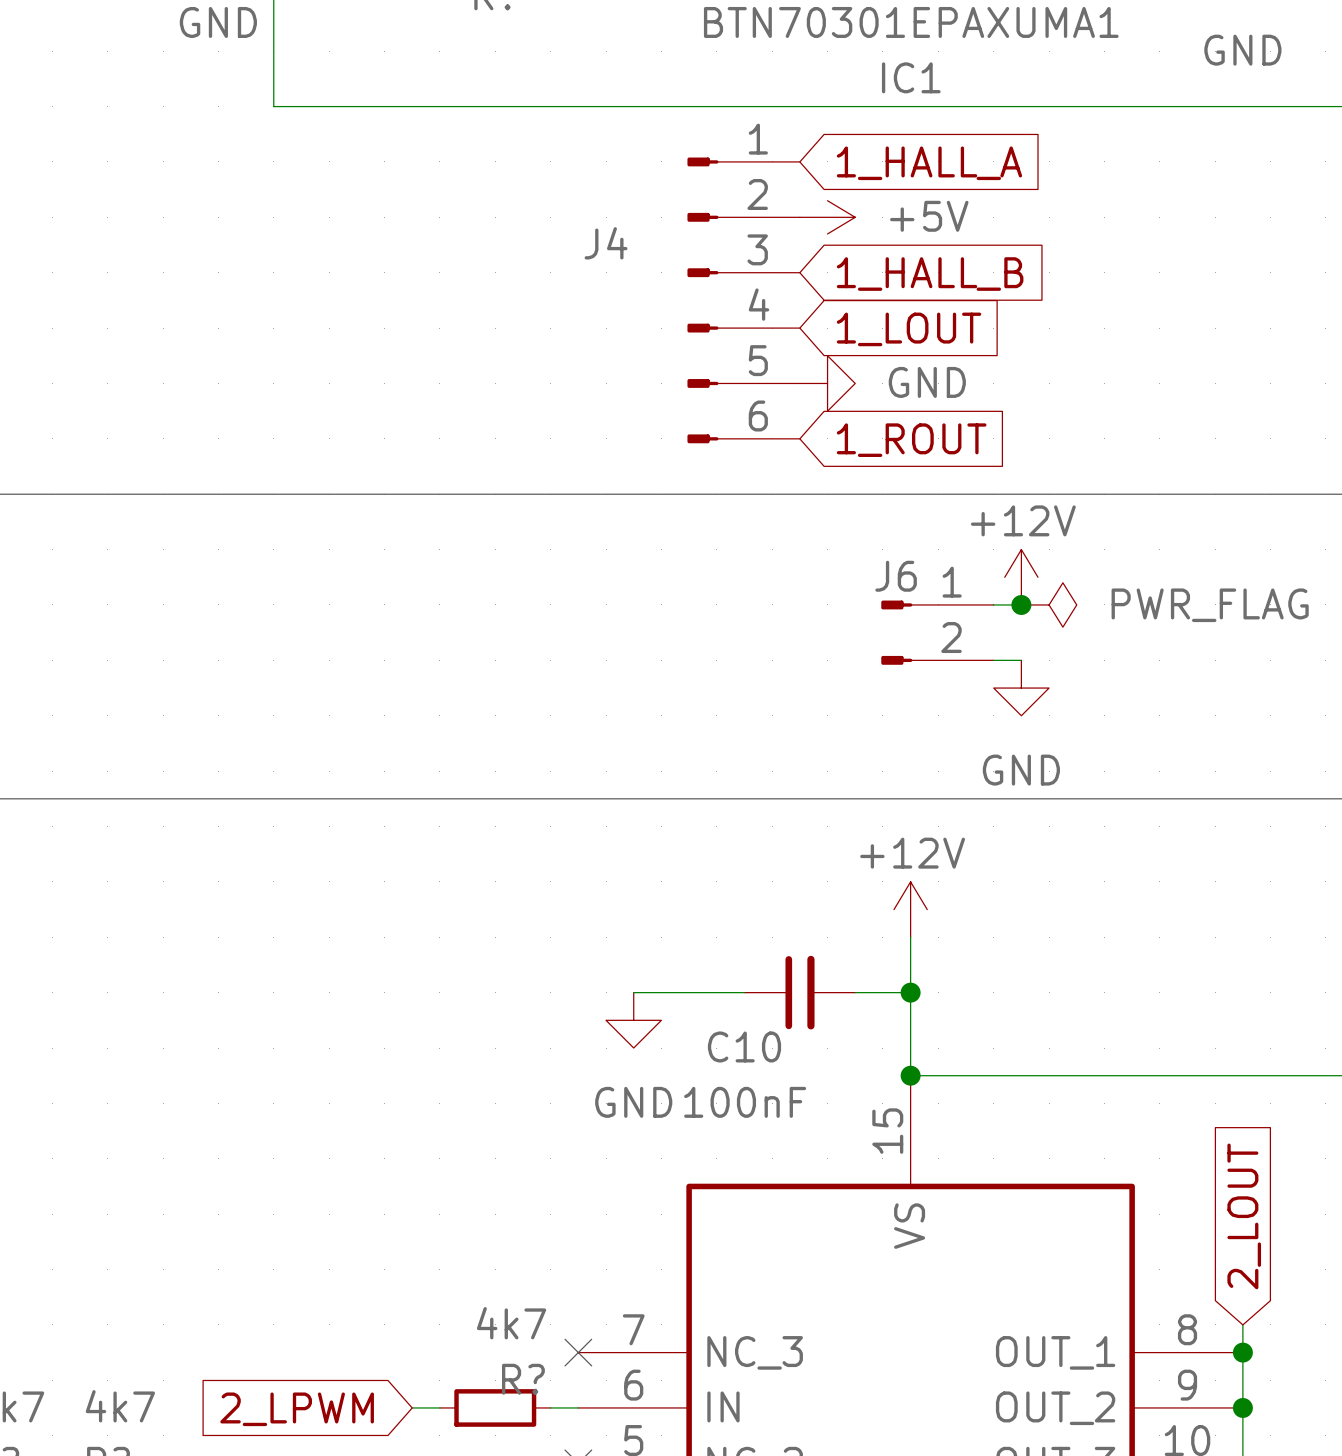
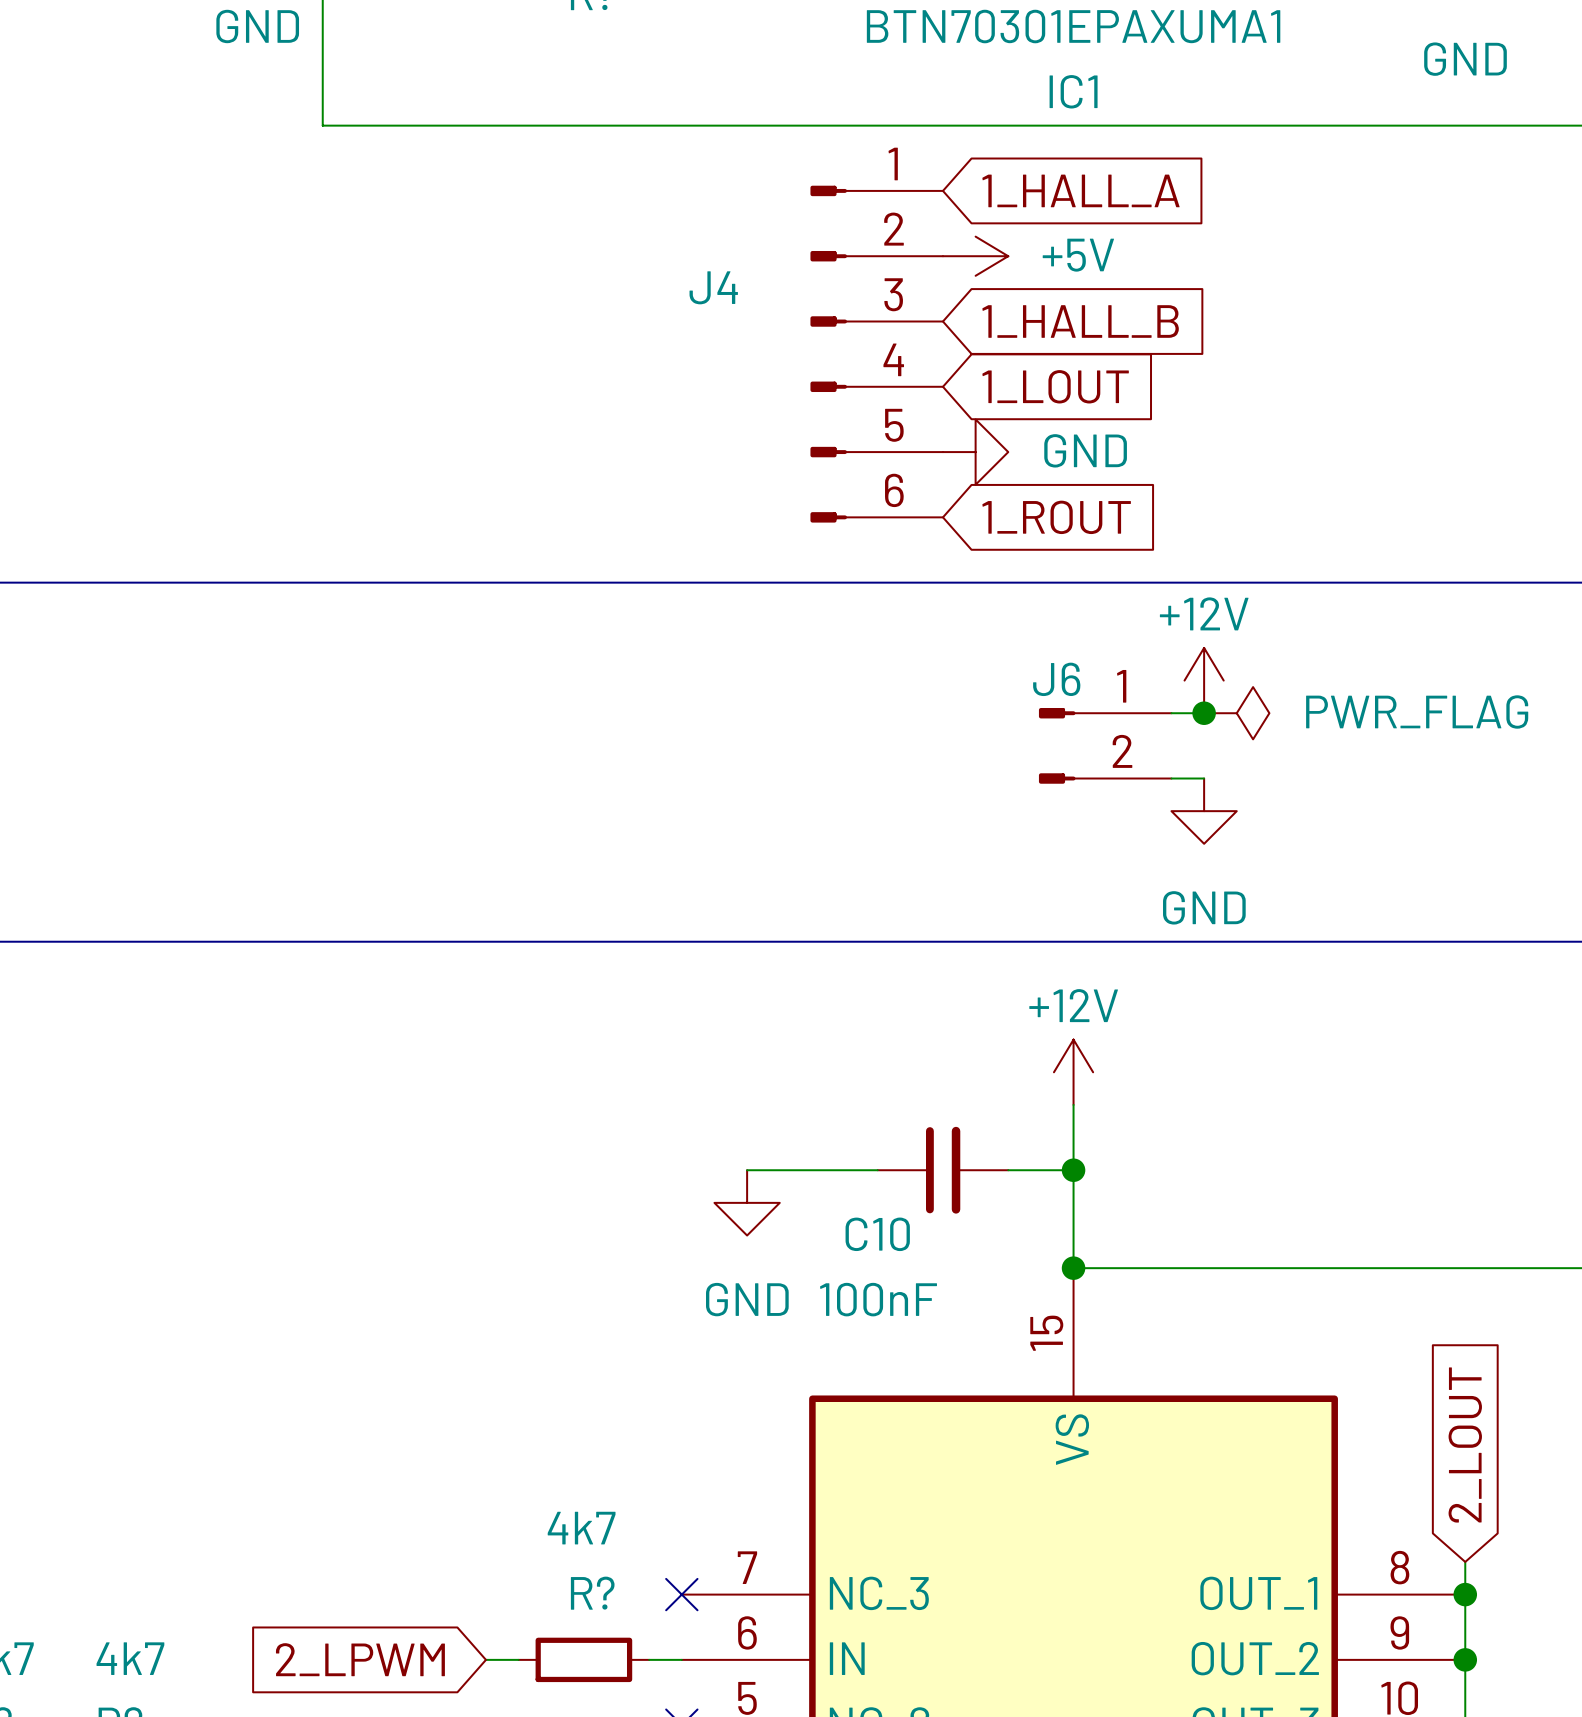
R? value position: 4k7 (511, 1323) -> 4k7 (581, 1528)
R? name position: R? (523, 1379) -> R? (592, 1593)

